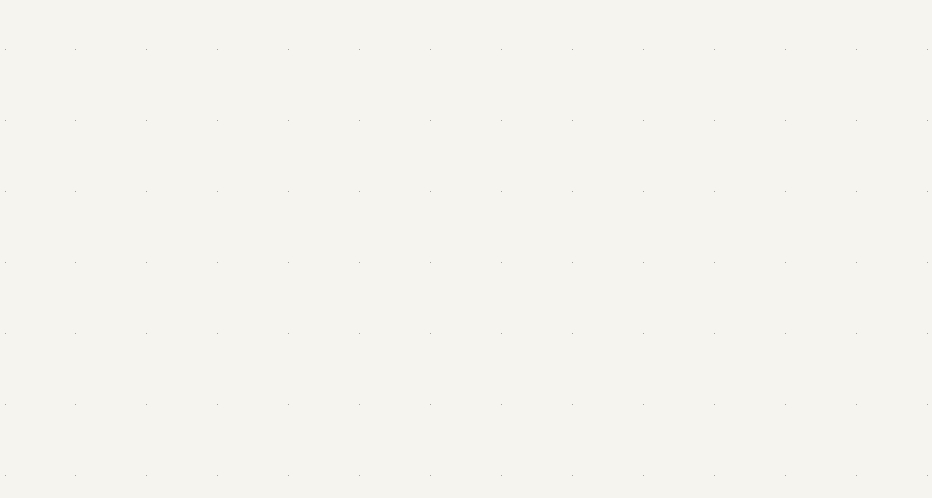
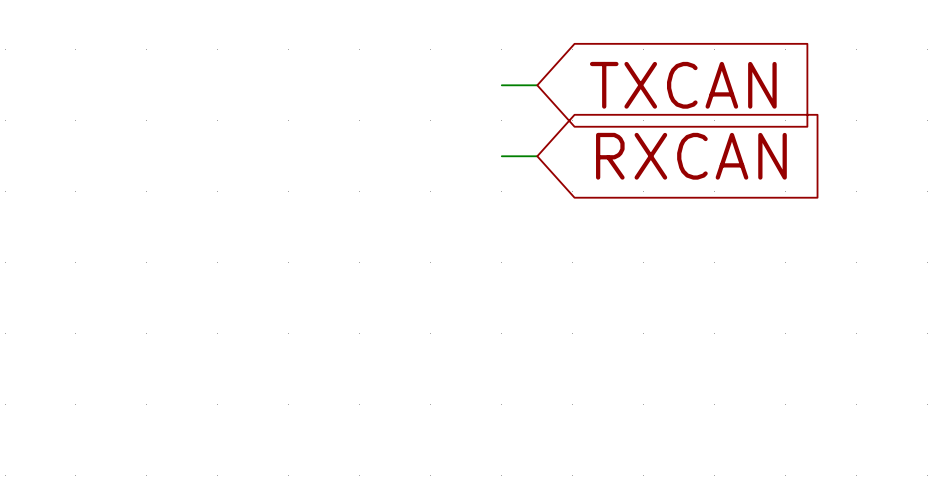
wire: none -> (501, 85) (537, 85)
global label: none -> TXCAN (683, 85)
wire: none -> (501, 156) (537, 156)
global label: none -> RXCAN (691, 156)

